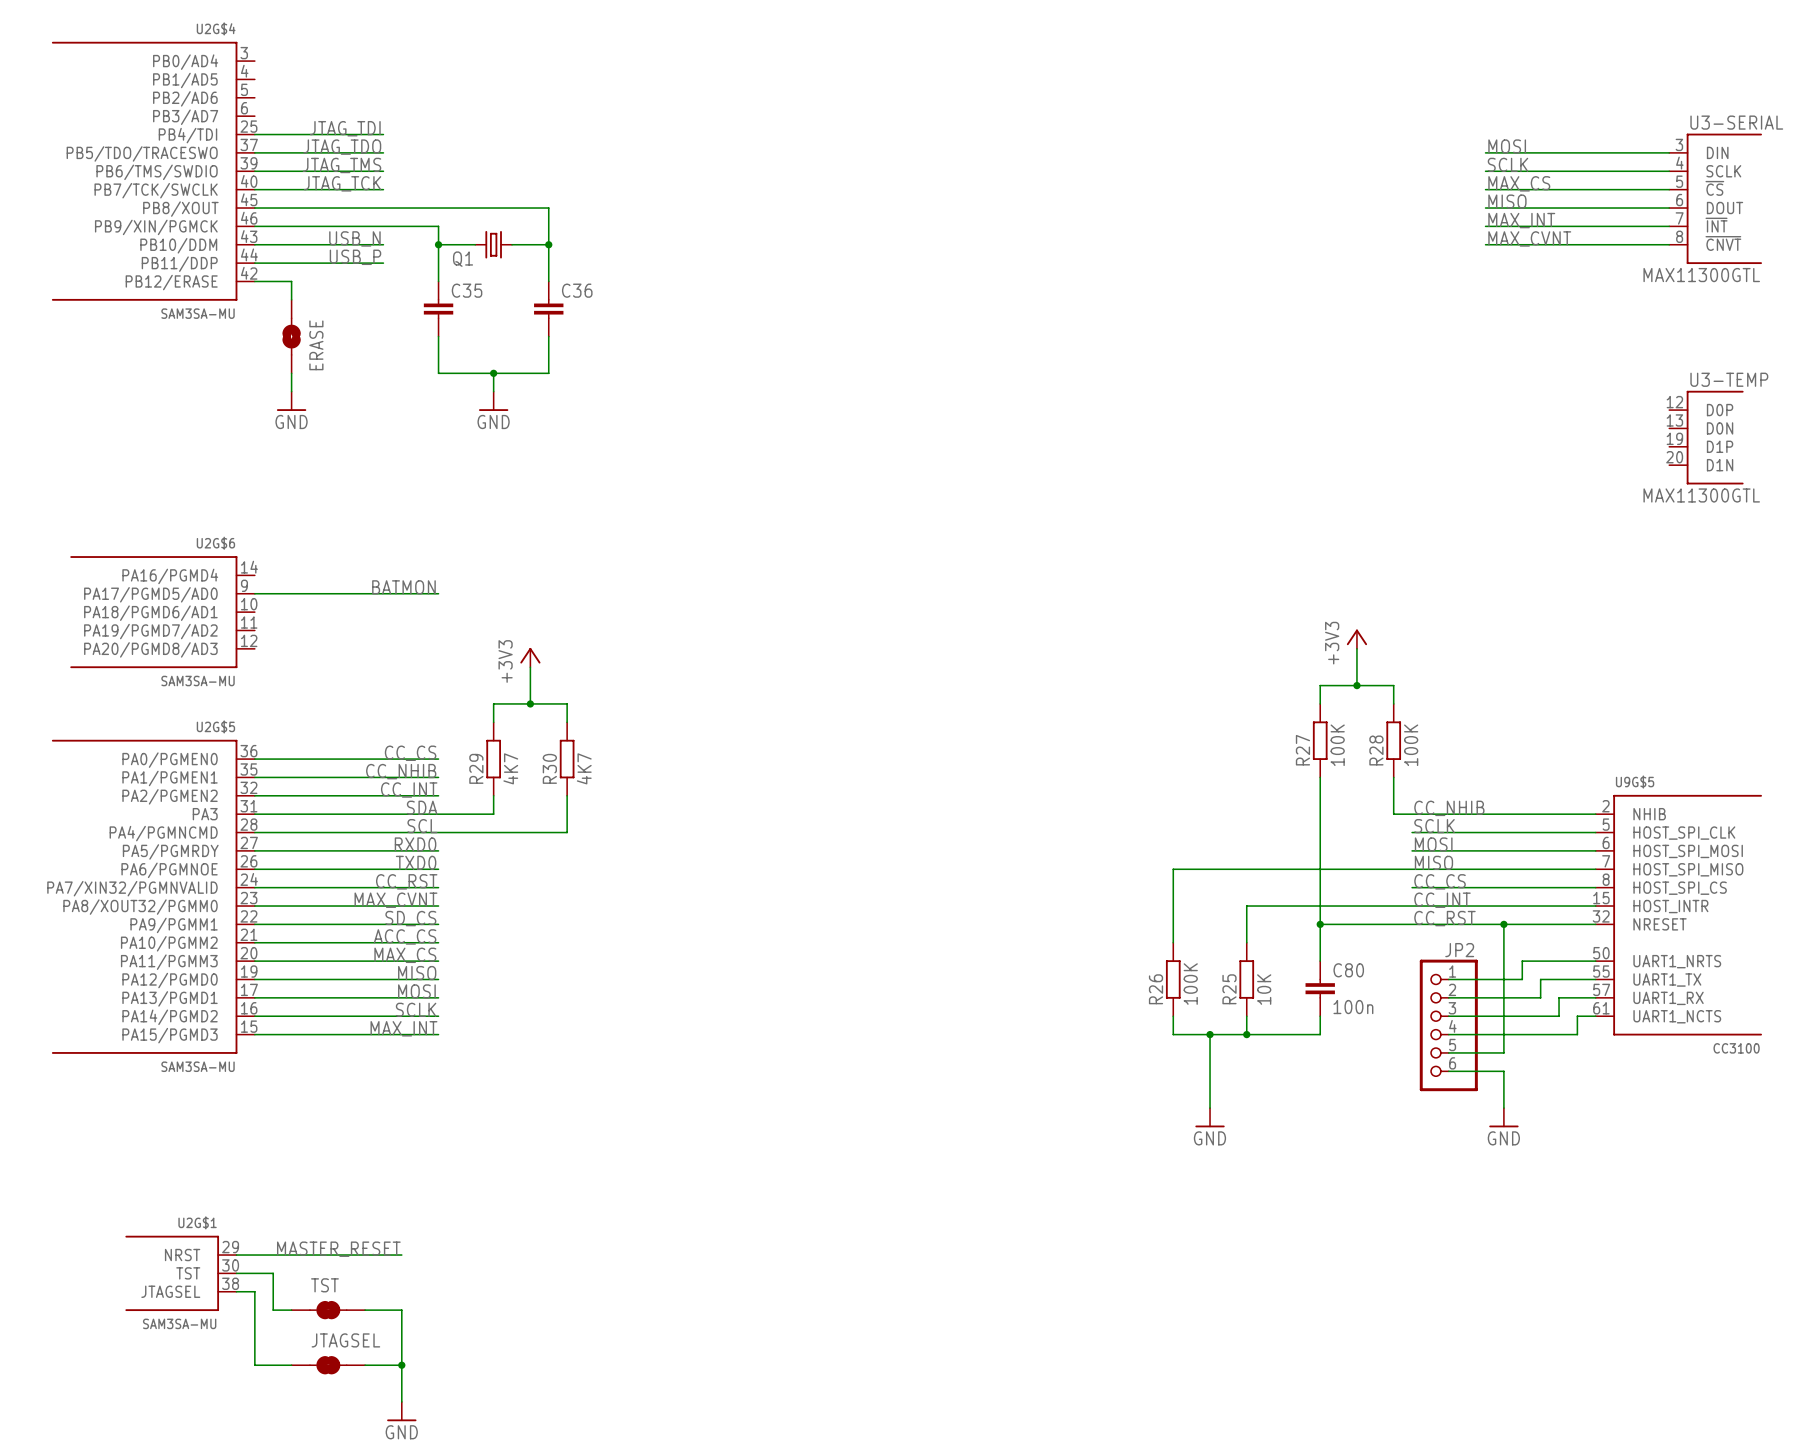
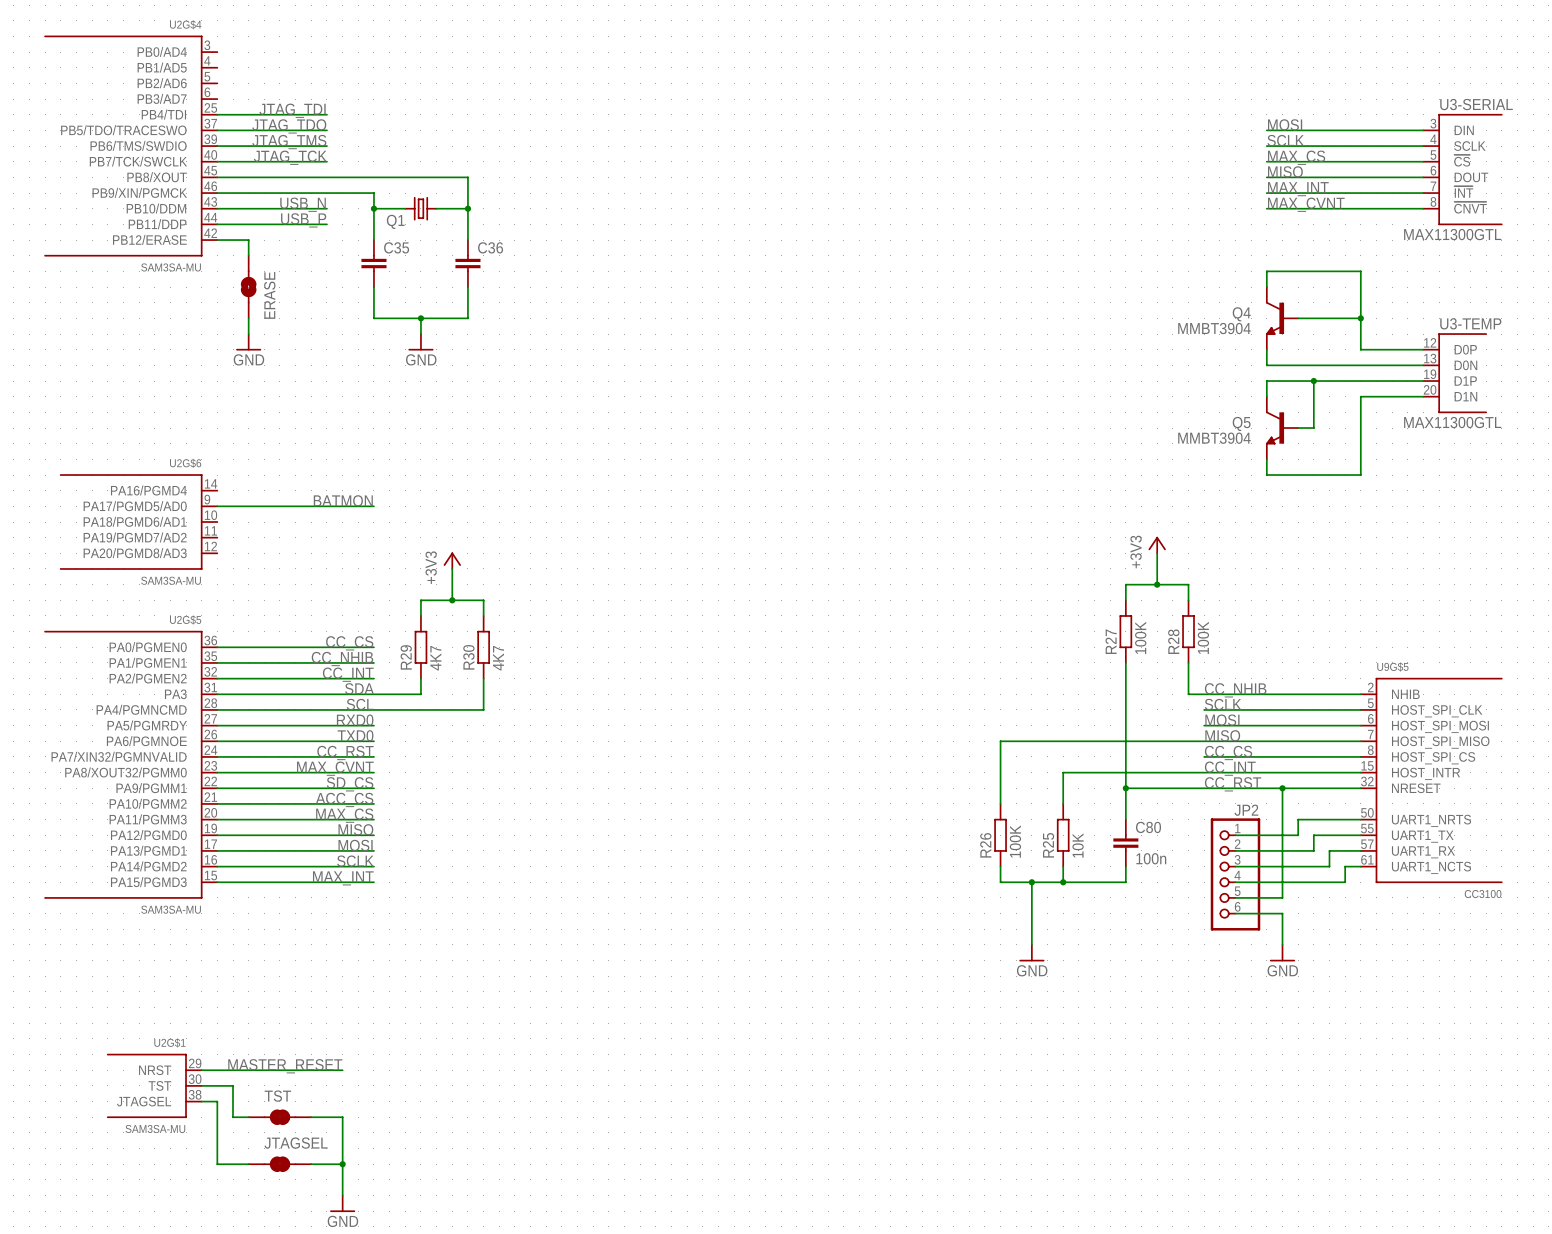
wire: none -> (1266, 287) (1266, 271) (1360, 271) (1360, 349) (1423, 349)
Q4: none -> MMBT3904 (1282, 318)
wire: none -> (1298, 318) (1360, 318)
junction: none -> (1360, 318)
wire: none -> (1266, 349) (1266, 365) (1423, 365)
wire: none -> (1313, 381) (1313, 428) (1298, 428)
junction: none -> (1313, 381)
wire: none -> (1423, 381) (1266, 381) (1266, 396)
wire: none -> (1423, 396) (1360, 396) (1360, 475) (1266, 475) (1266, 459)
Q5: none -> MMBT3904 (1282, 428)

